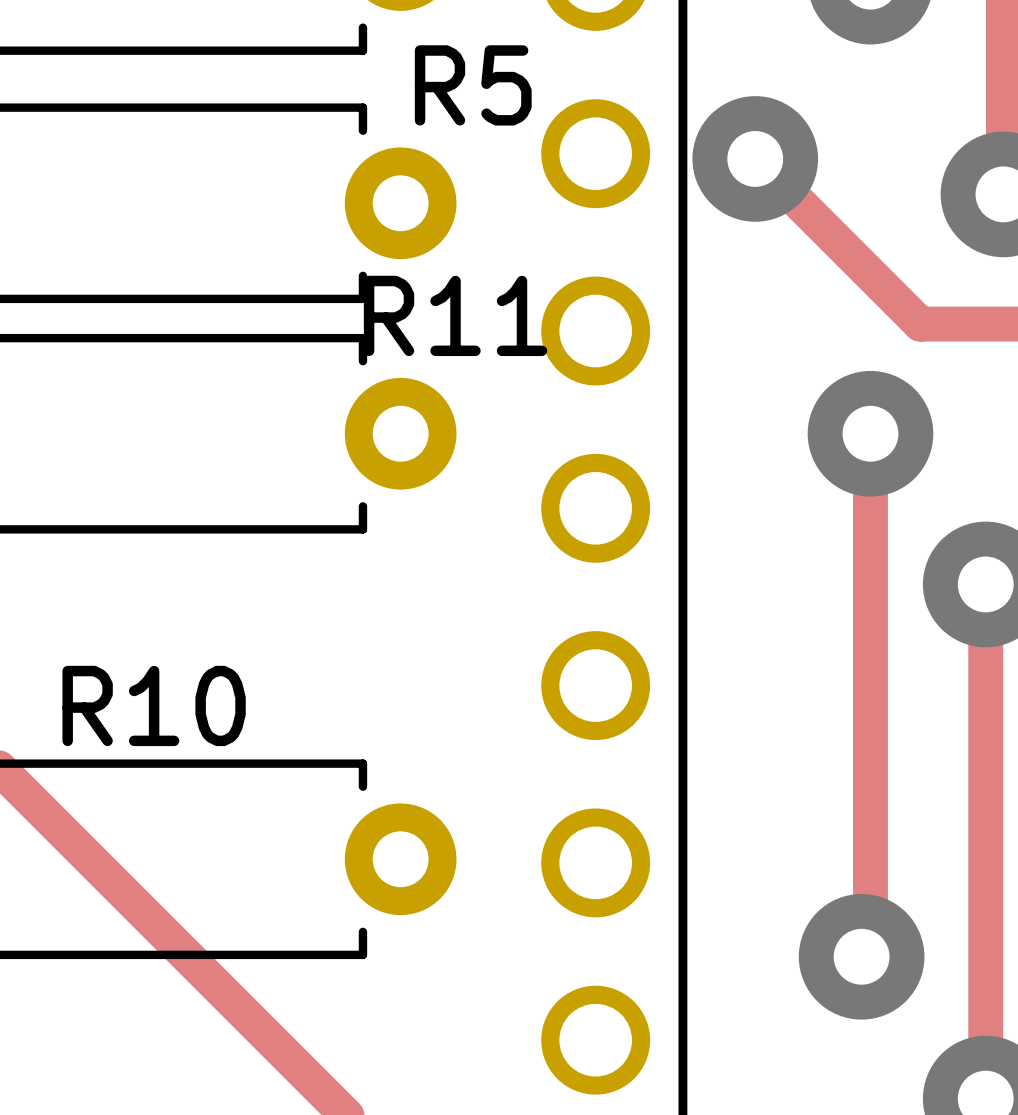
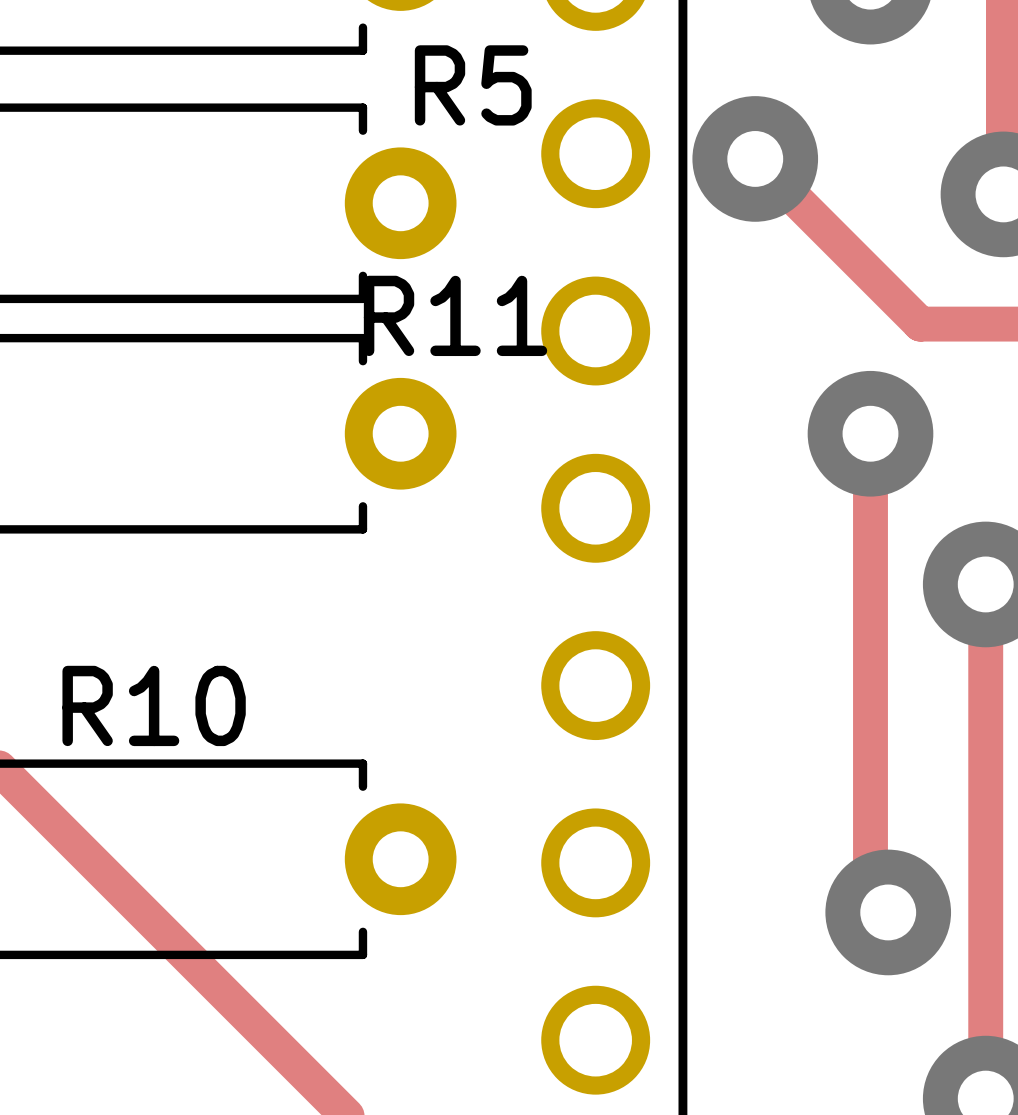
via position: (861, 956) -> (888, 912)

